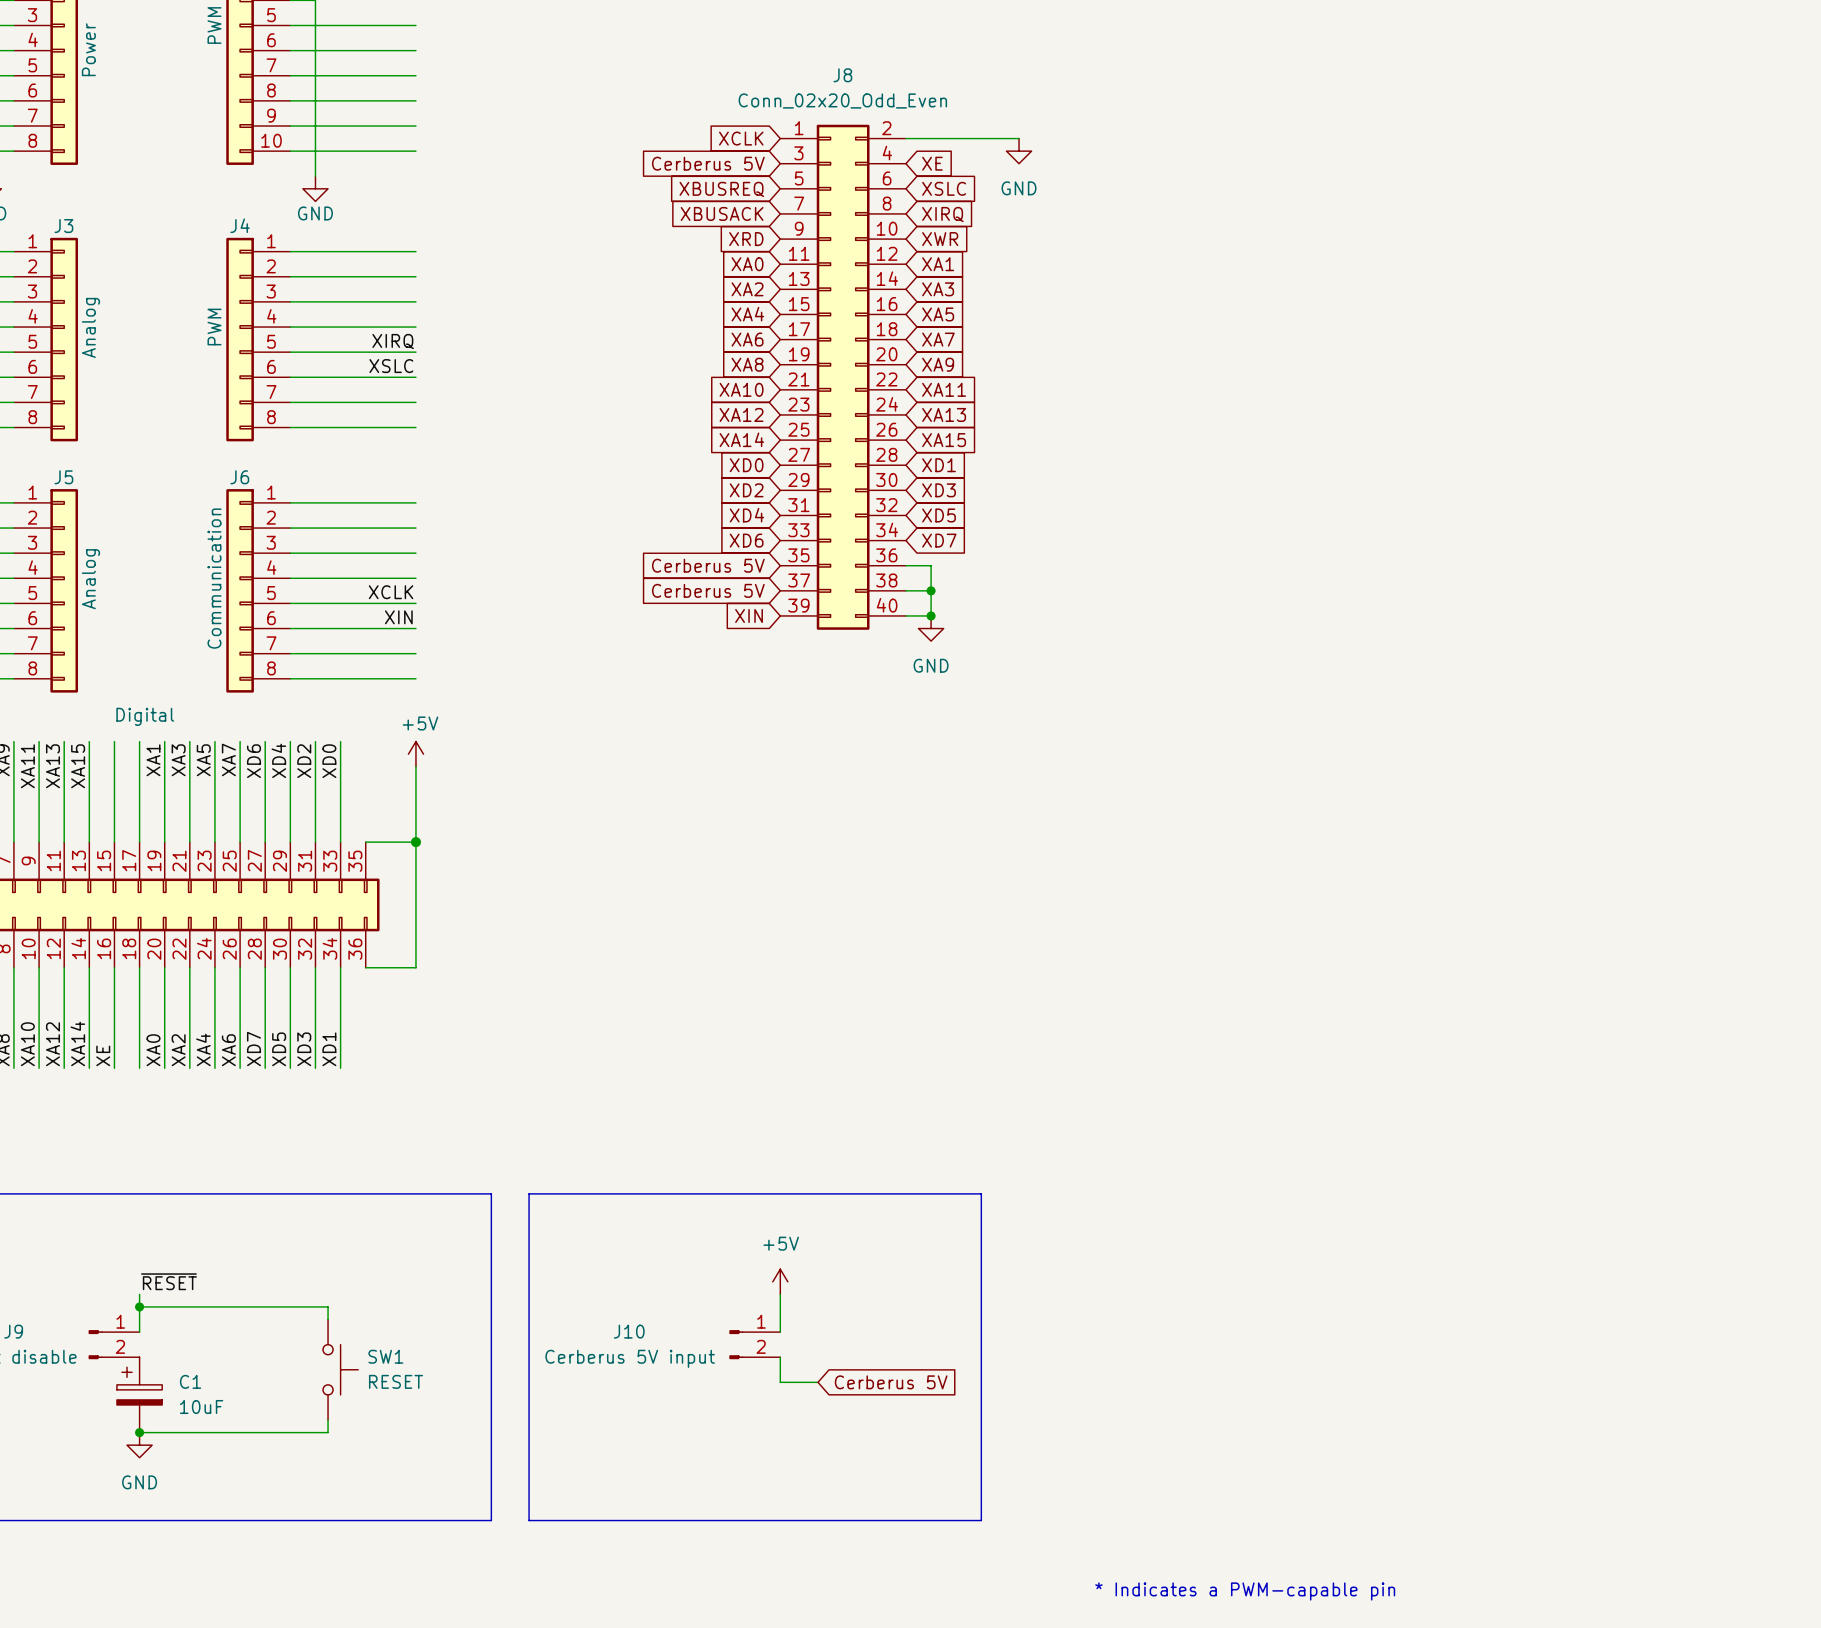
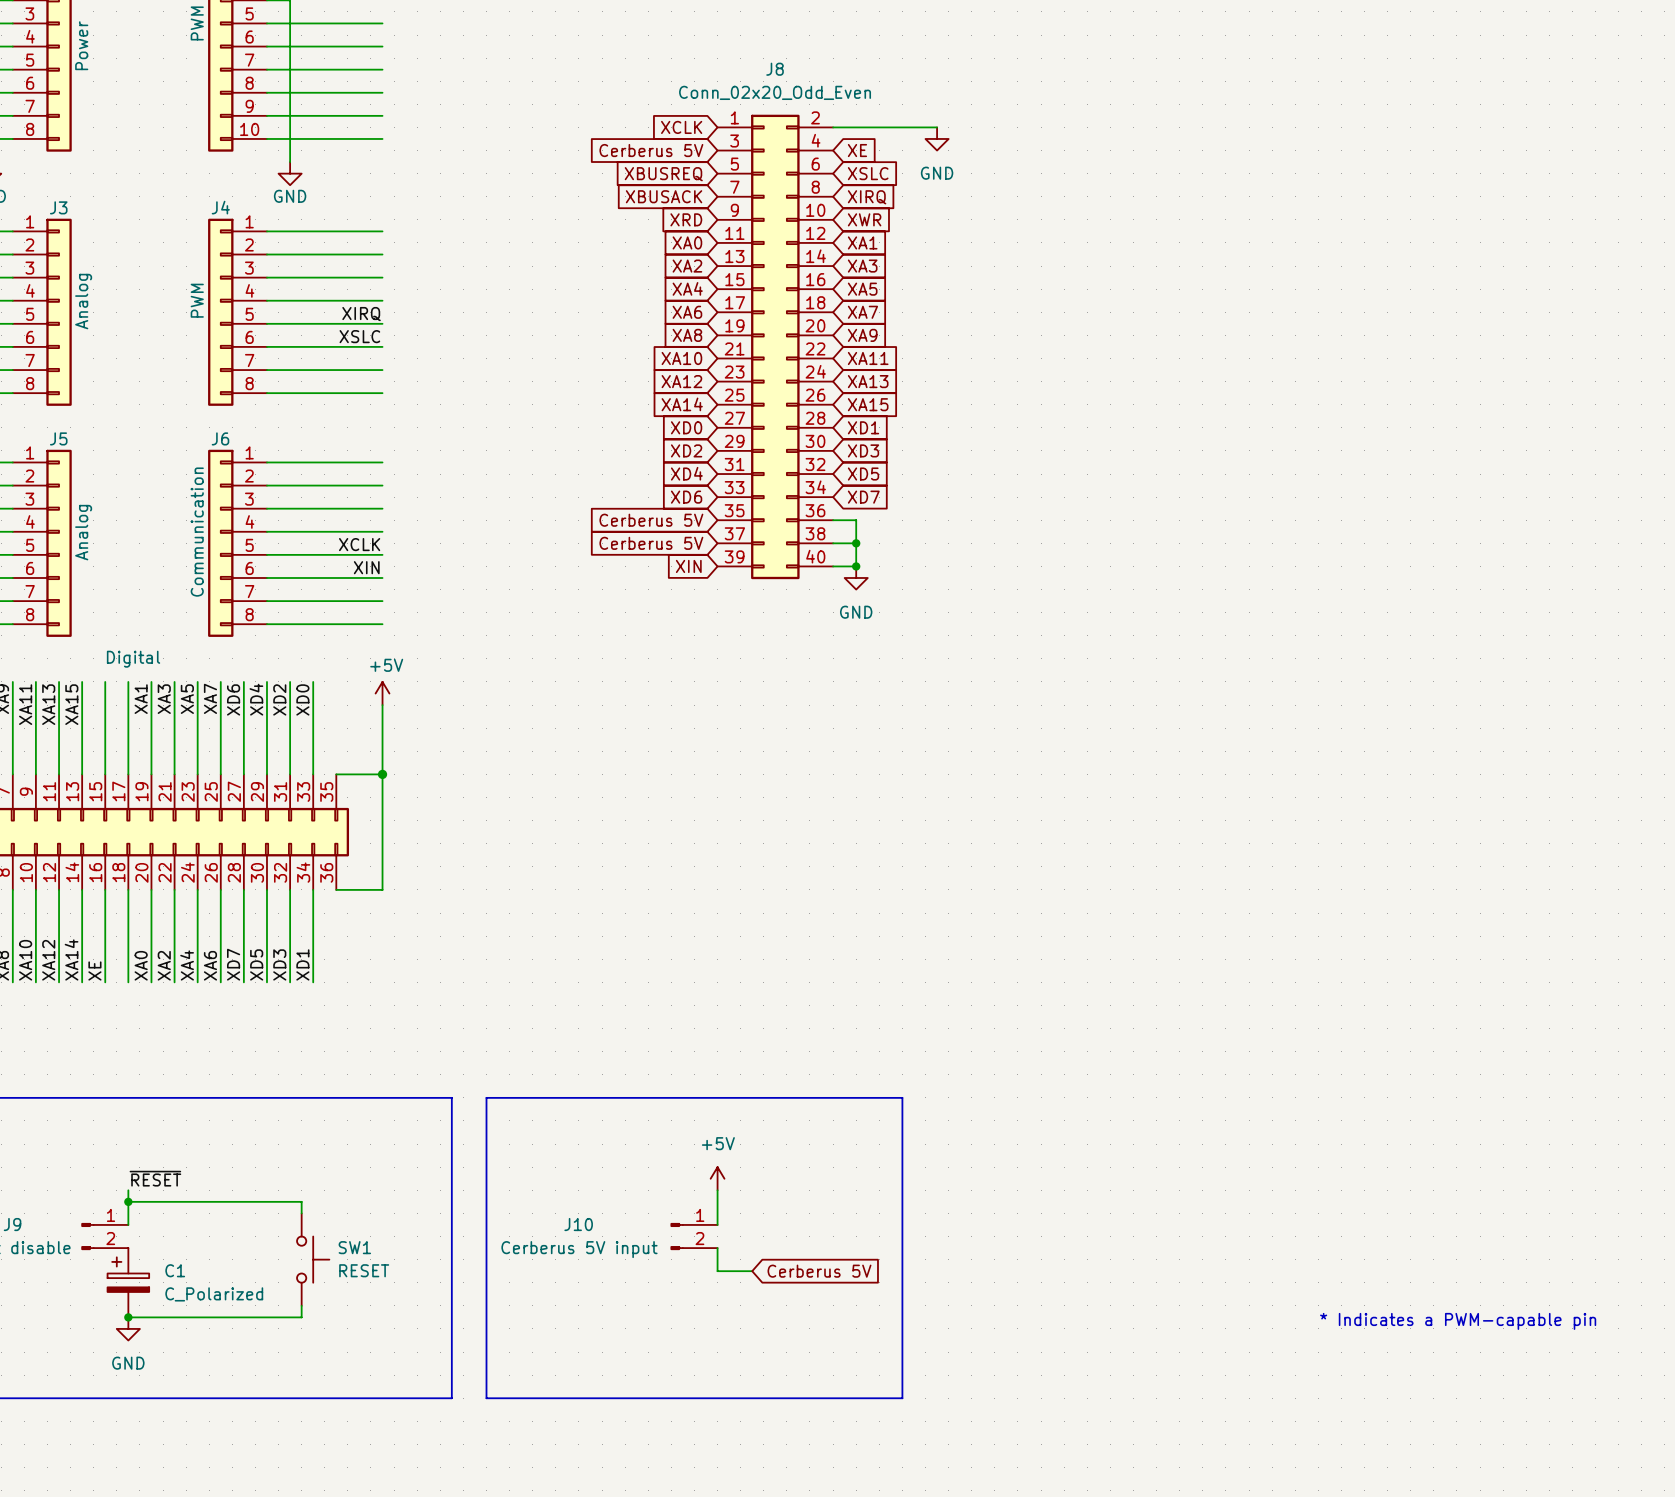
C1 value: 10uF (201, 1407) -> C_Polarized (214, 1294)
text: none -> * Indicates a PWM-capable pin (1458, 1321)
text: * Indicates a PWM-capable pin (1245, 1591) -> none

